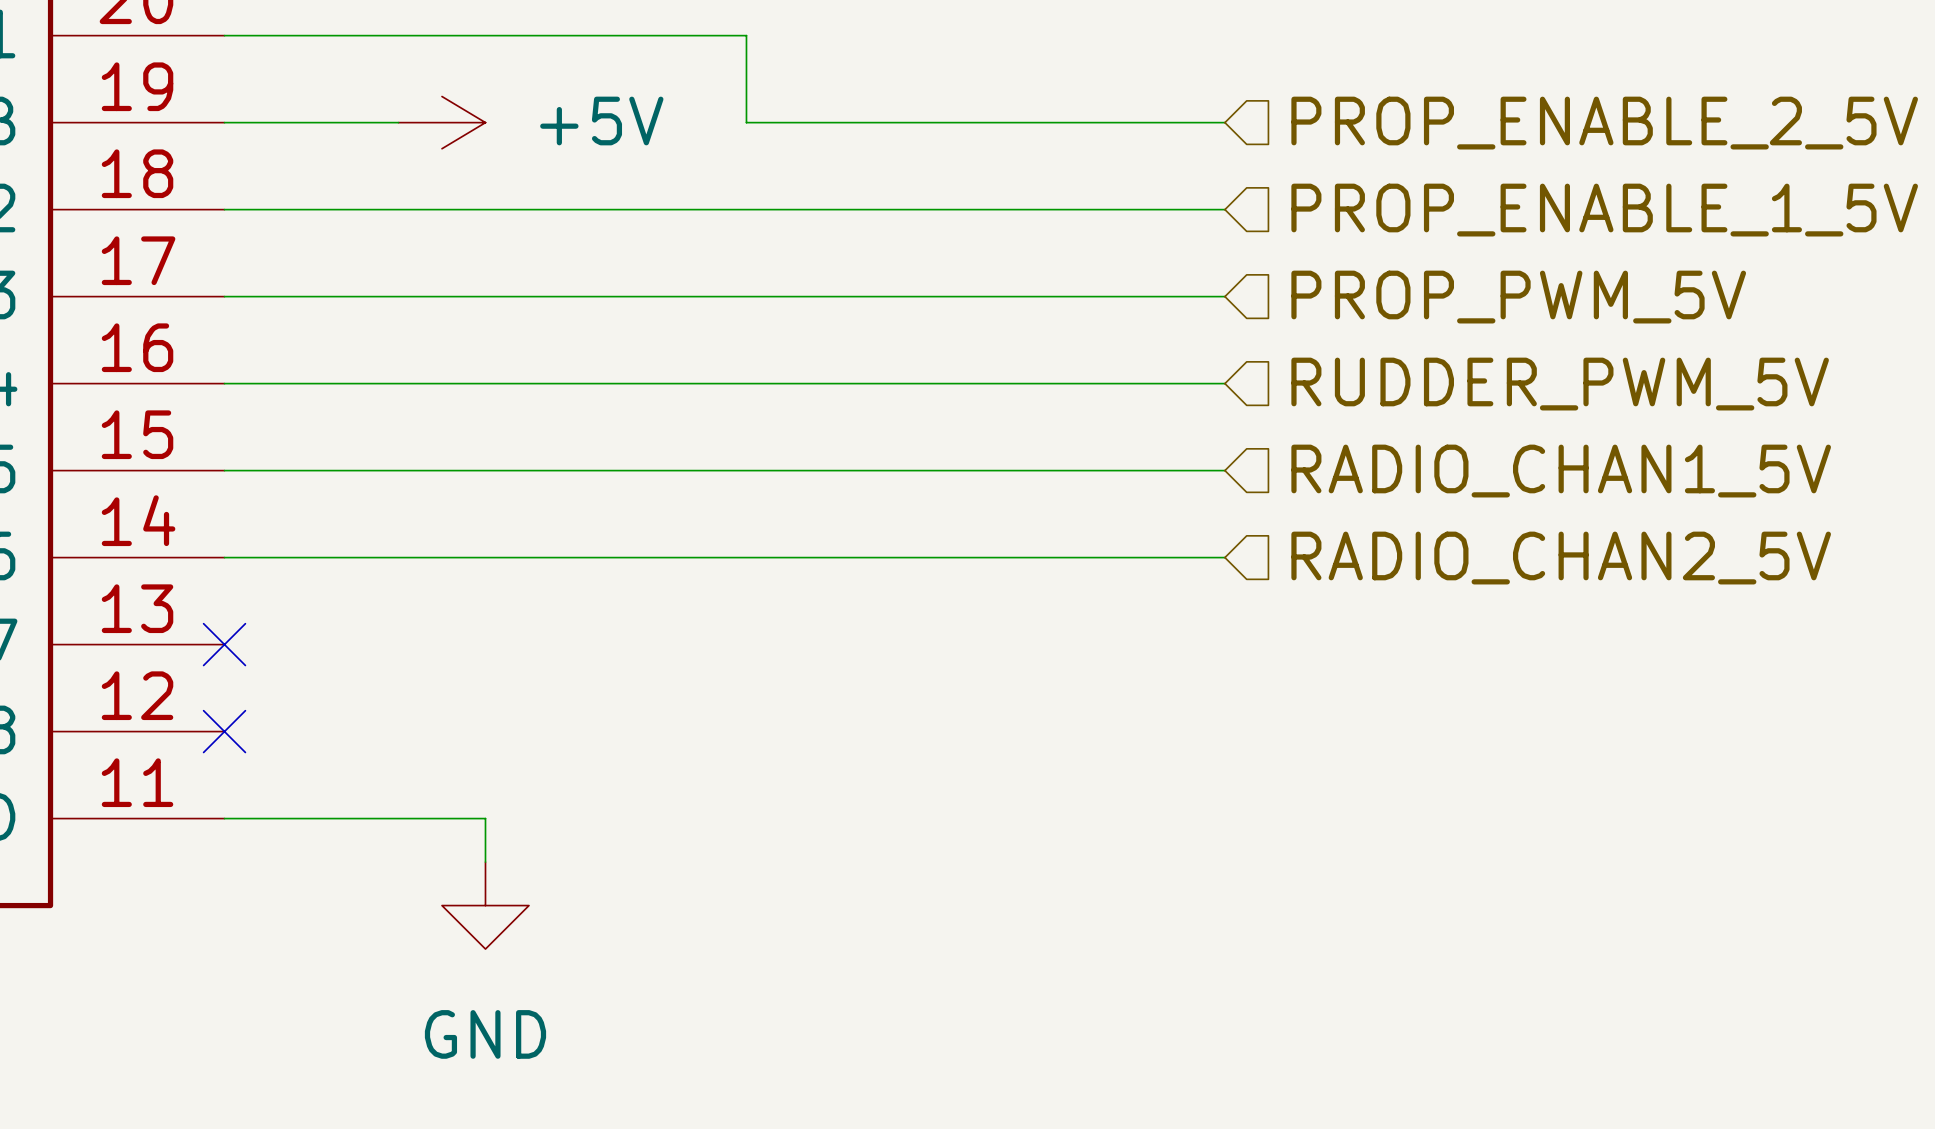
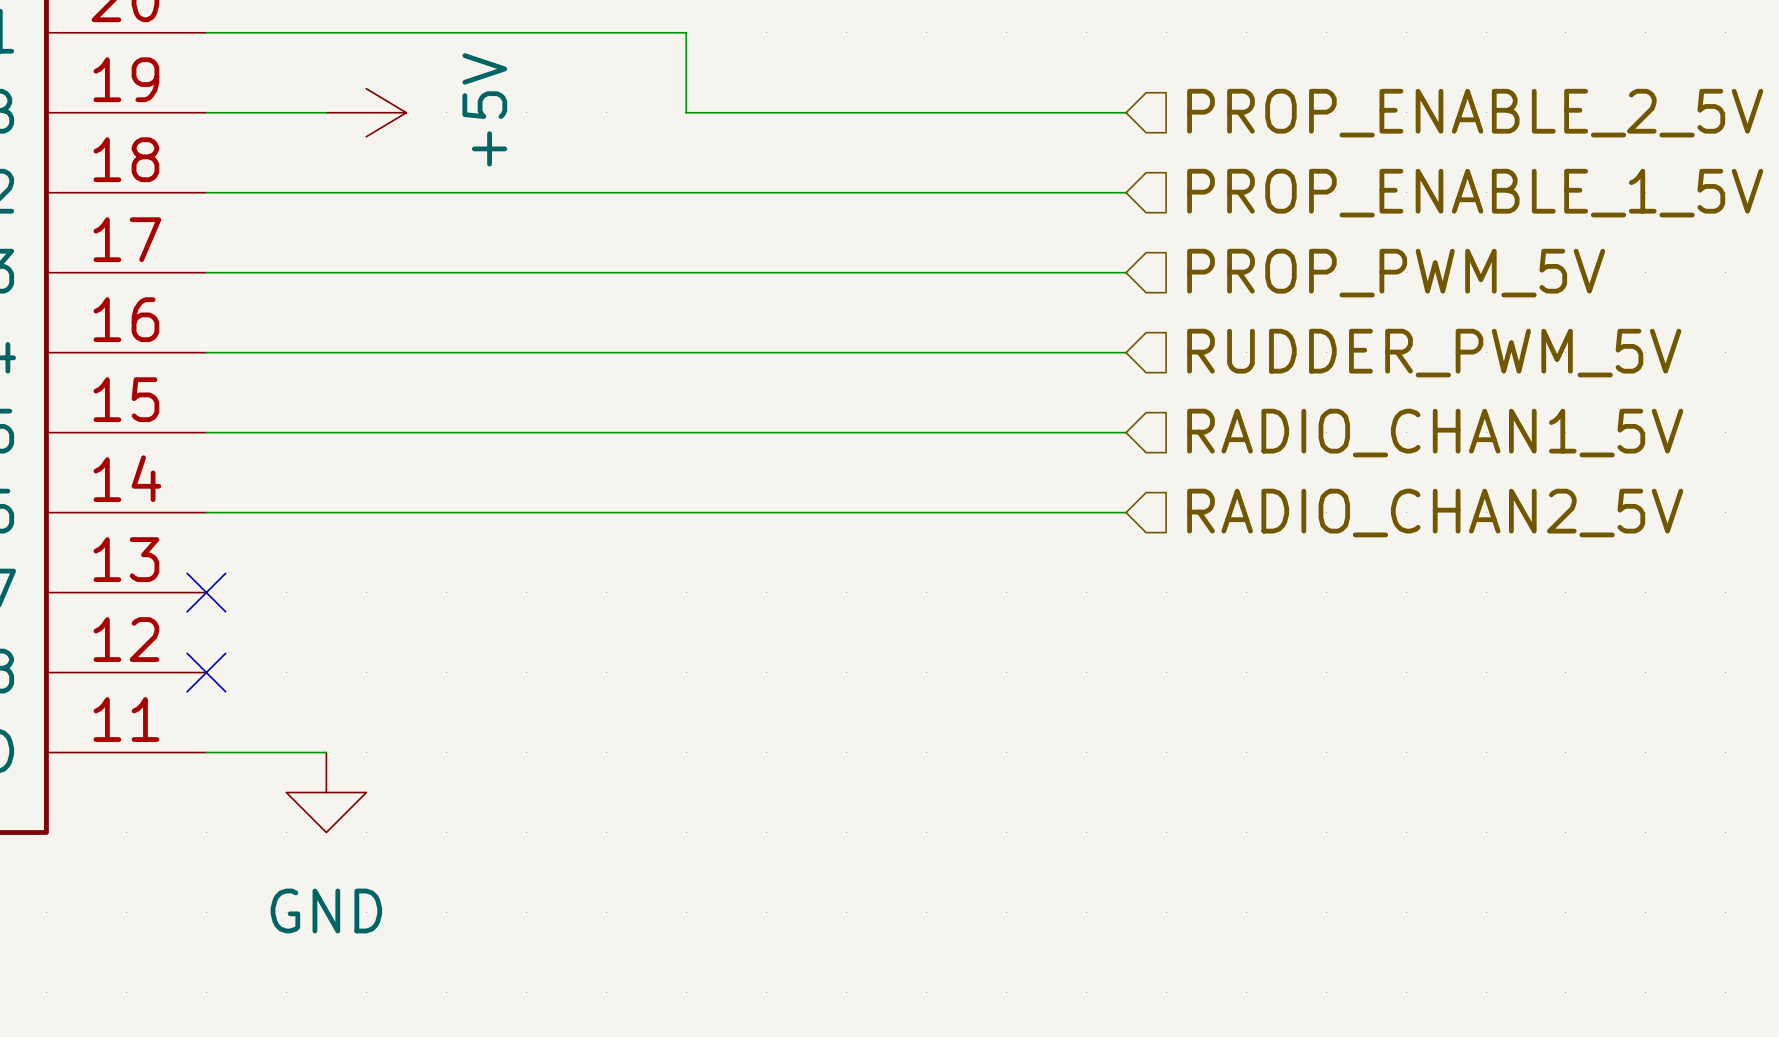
power symbol text rotation: 0° (601, 120) -> 90° counterclockwise (484, 109)
power symbol position: +5V (441, 122) -> +5V (366, 112)
wire: (355, 818) (485, 818) (485, 862) -> none
power symbol position: GND (485, 905) -> GND (326, 792)

